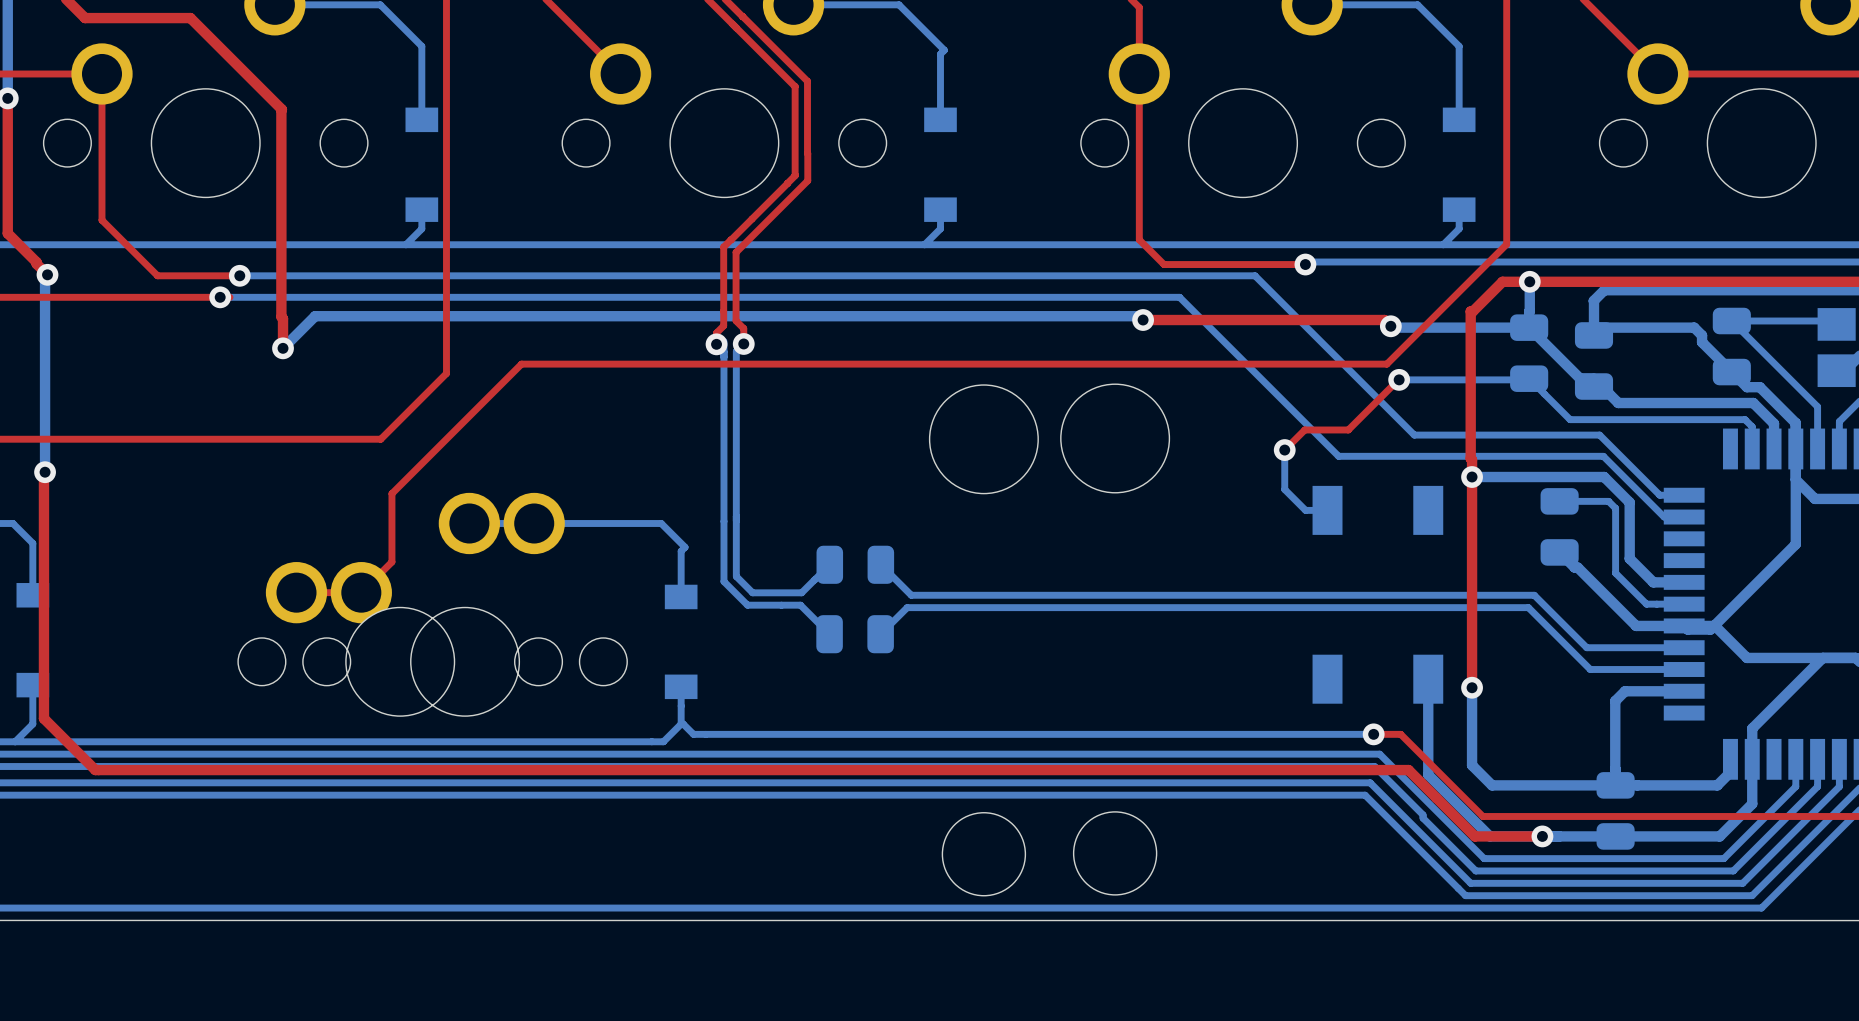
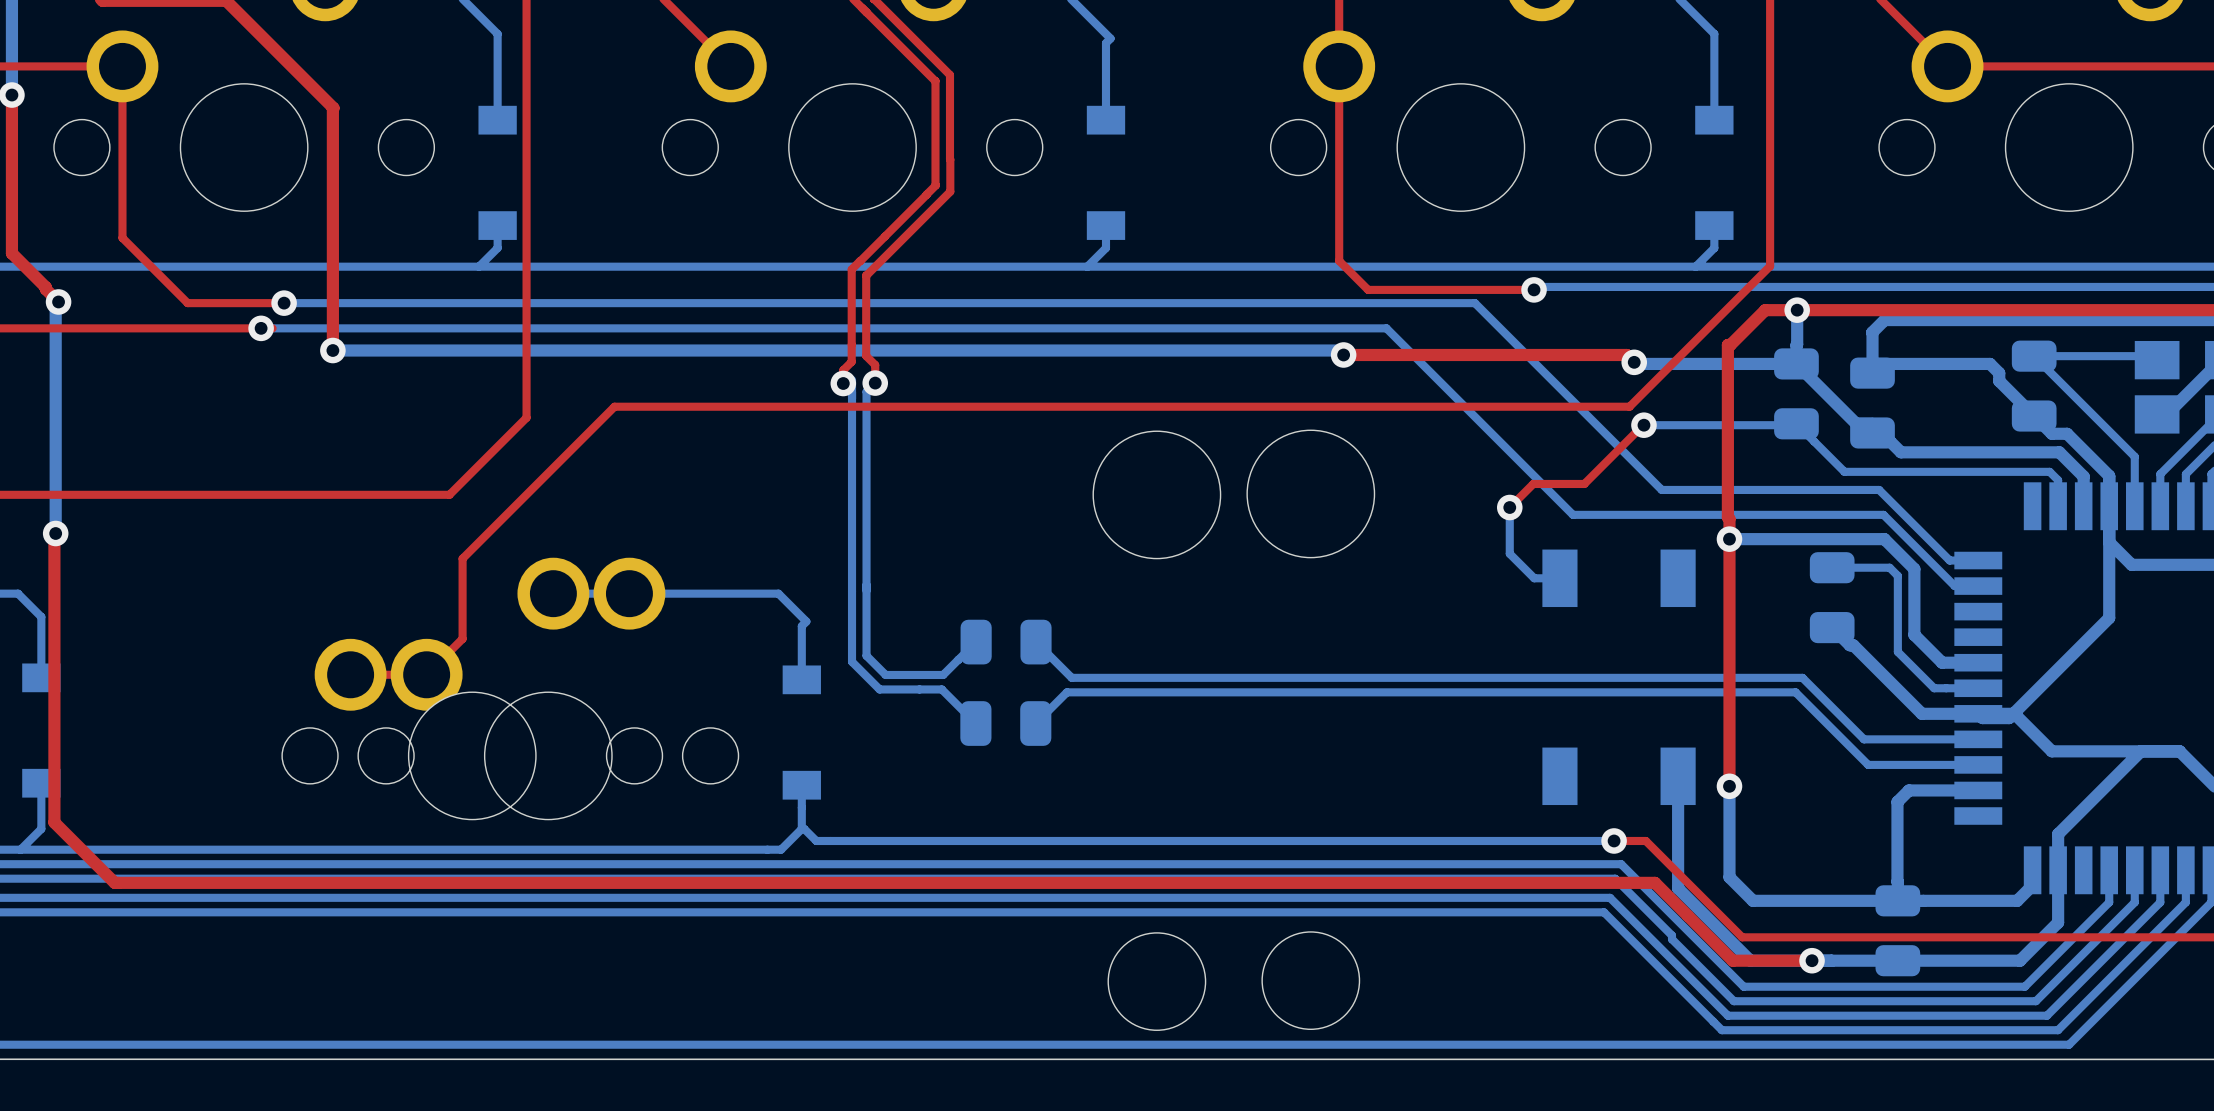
bottom track: (315, 316) (283, 348) (286, 348) -> (372, 350) (332, 350)
top track: (281, 317) (283, 318) (283, 348) -> none
via position: (283, 348) -> (332, 350)

